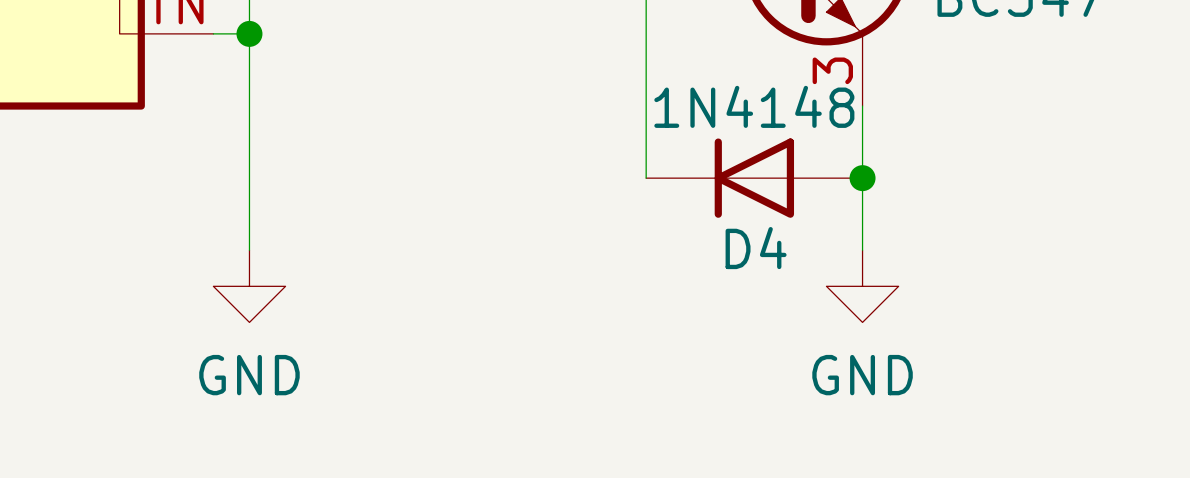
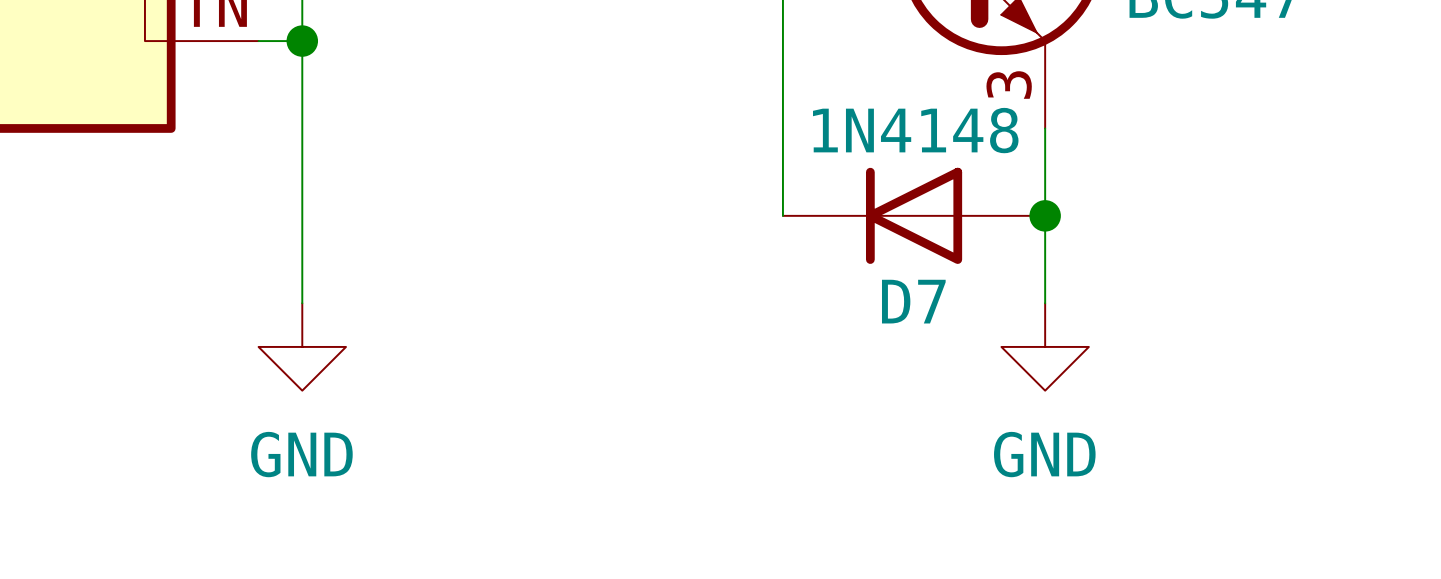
D4 name: D4 (756, 248) -> D7 (913, 301)

